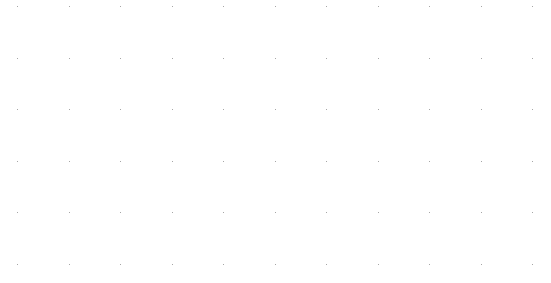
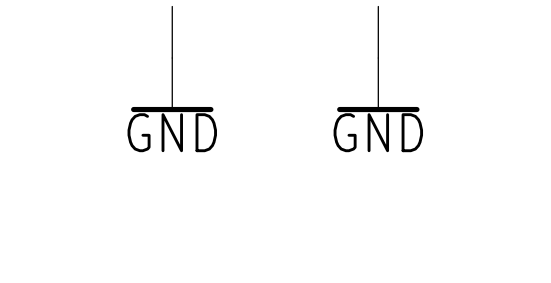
wire: none -> (172, 6) (172, 58)
wire: none -> (378, 6) (378, 58)
power symbol: none -> GND (172, 85)
power symbol: none -> GND (378, 85)

